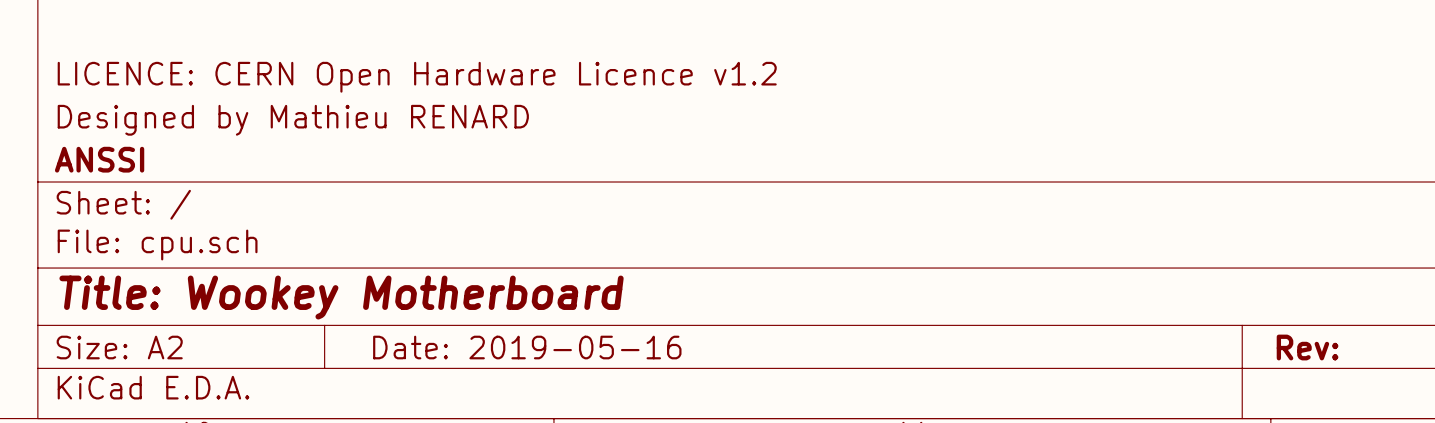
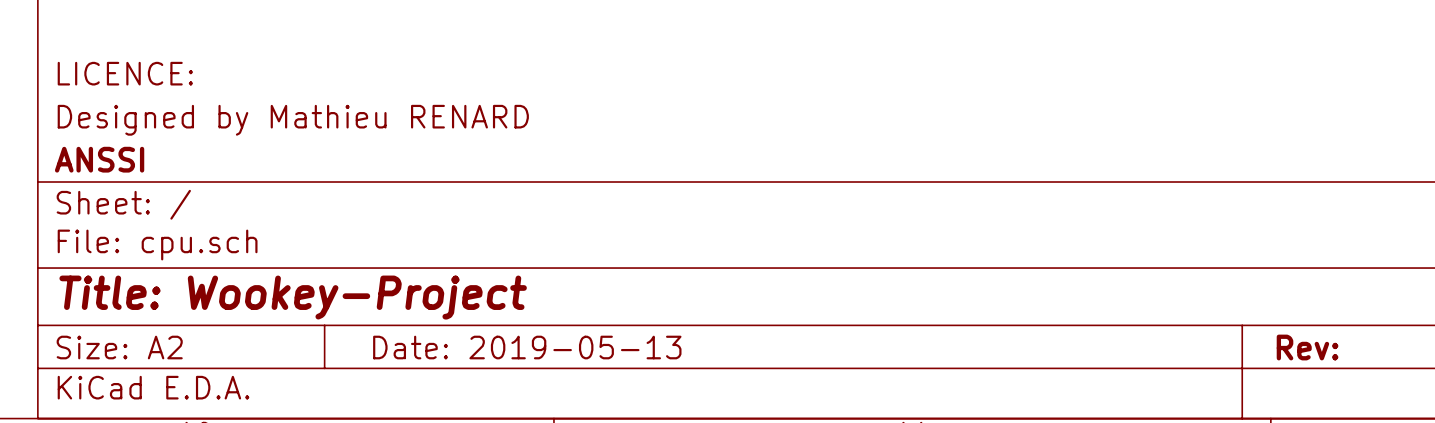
title block: LICENCE: CERN Open Hardware Licence v1.2 (417, 77) -> LICENCE: (125, 73)
title block: Title: Wookey Motherboard (341, 297) -> Title: Wookey-Project (293, 297)
title block: Date: 2019-05-16 (527, 347) -> Date: 2019-05-13 (527, 347)

